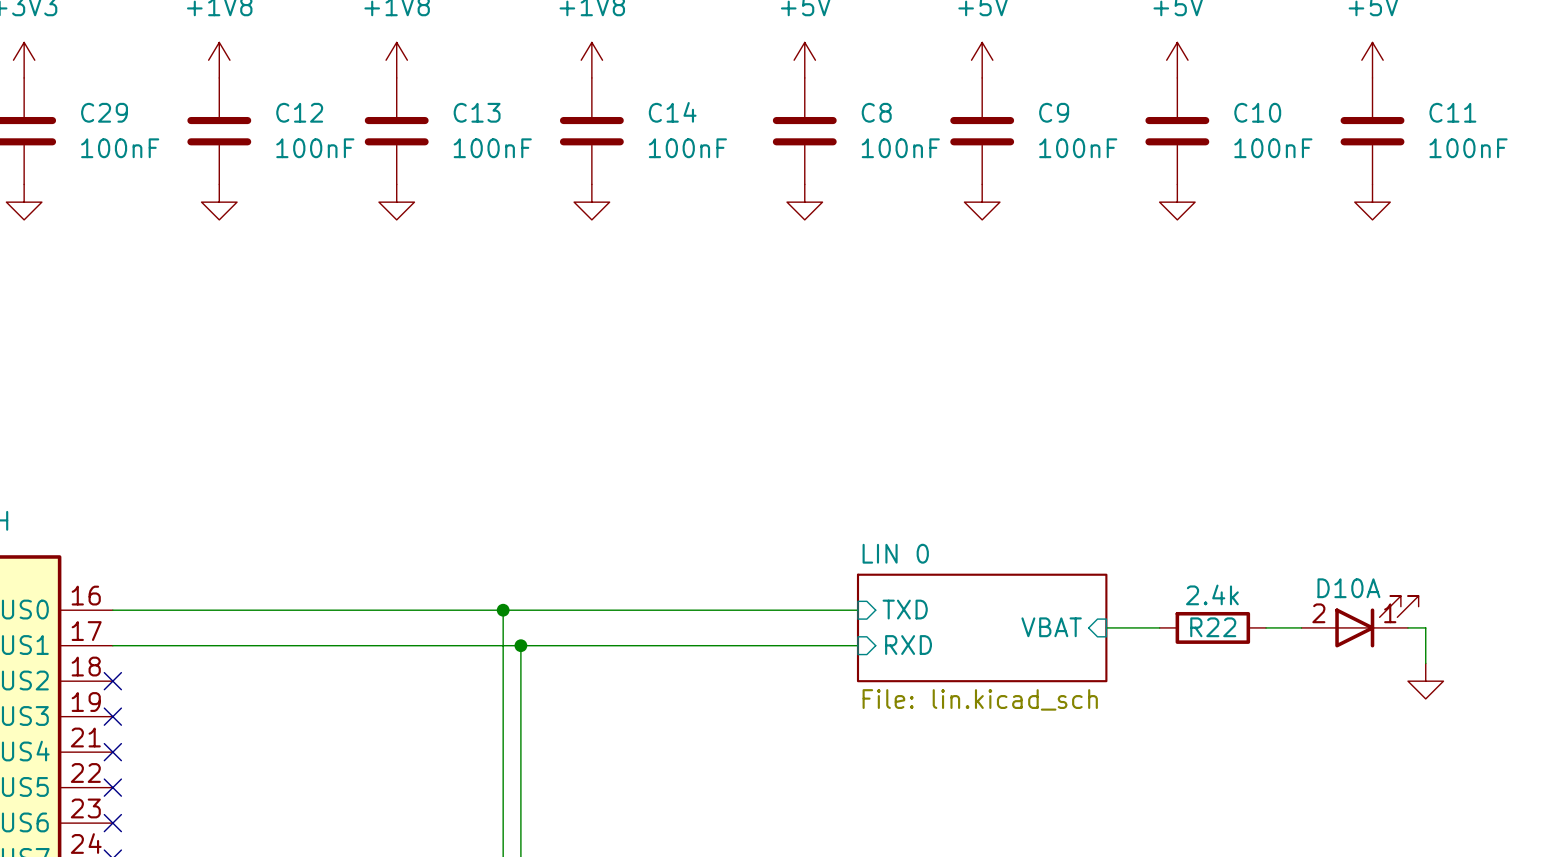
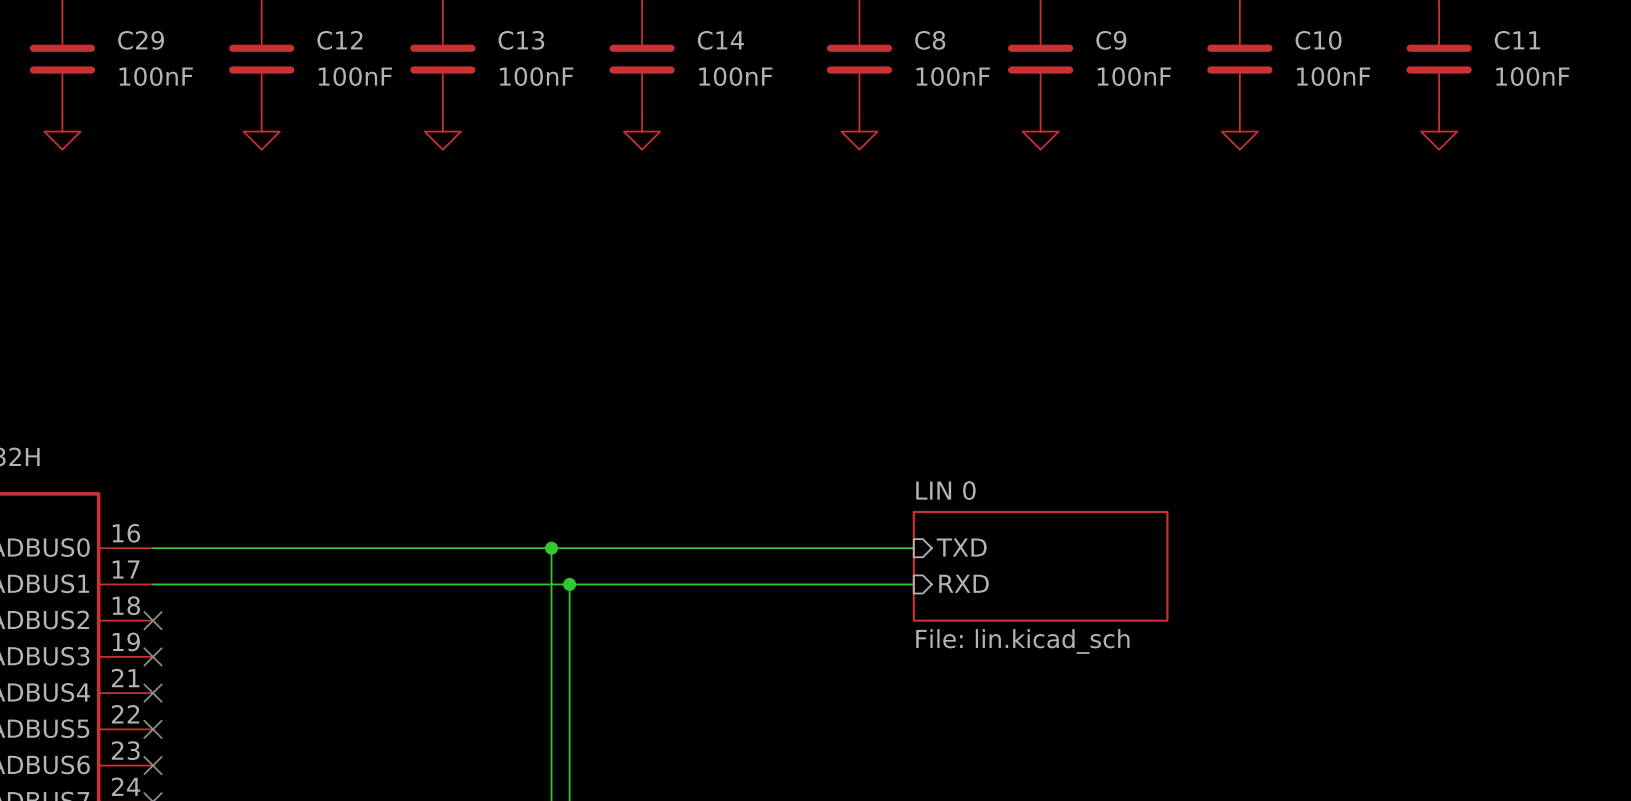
D10A: (1360, 621) -> none
sheet pin: VBAT (1051, 627) -> none
wire: (1106, 627) (1159, 627) -> none
R22: 2.4k (1212, 627) -> none
wire: (1266, 627) (1301, 627) -> none
wire: (1407, 627) (1425, 627) (1425, 663) -> none
power symbol: (1425, 681) -> none

